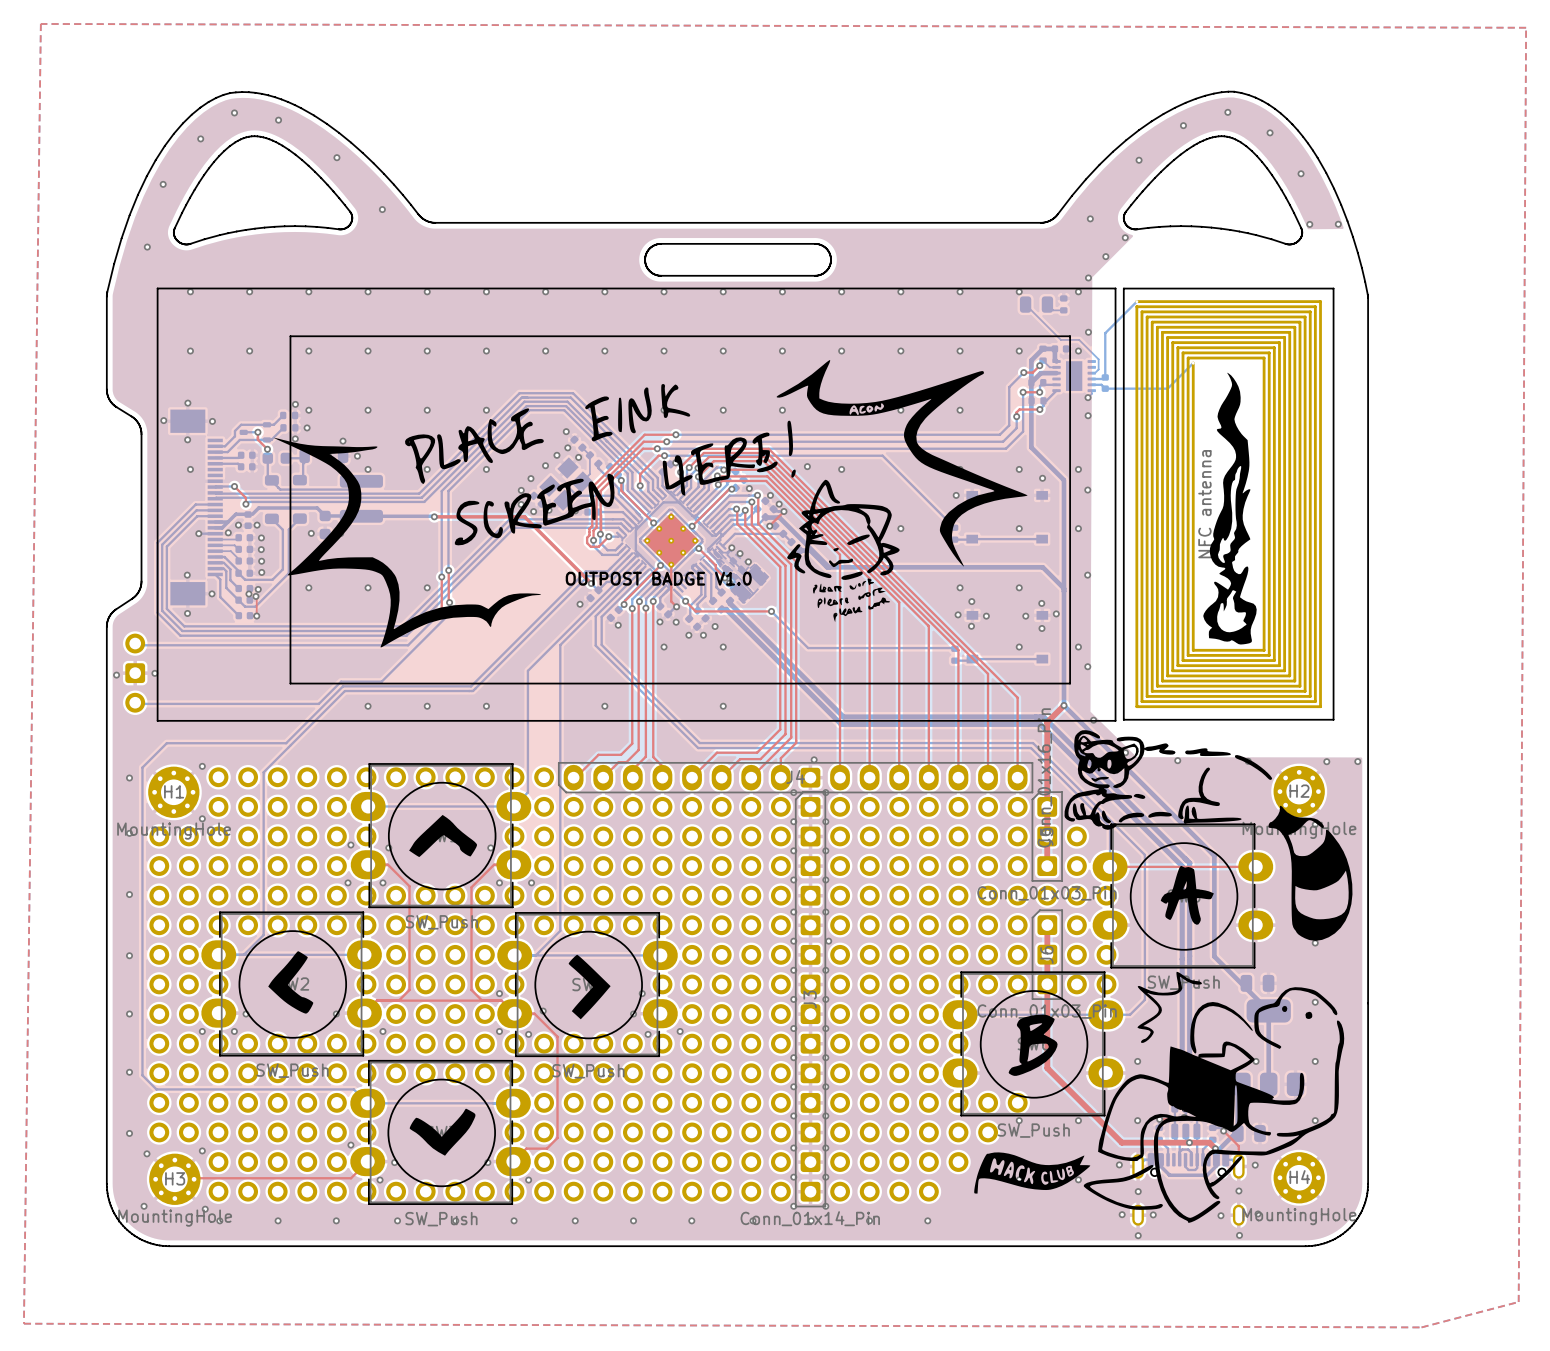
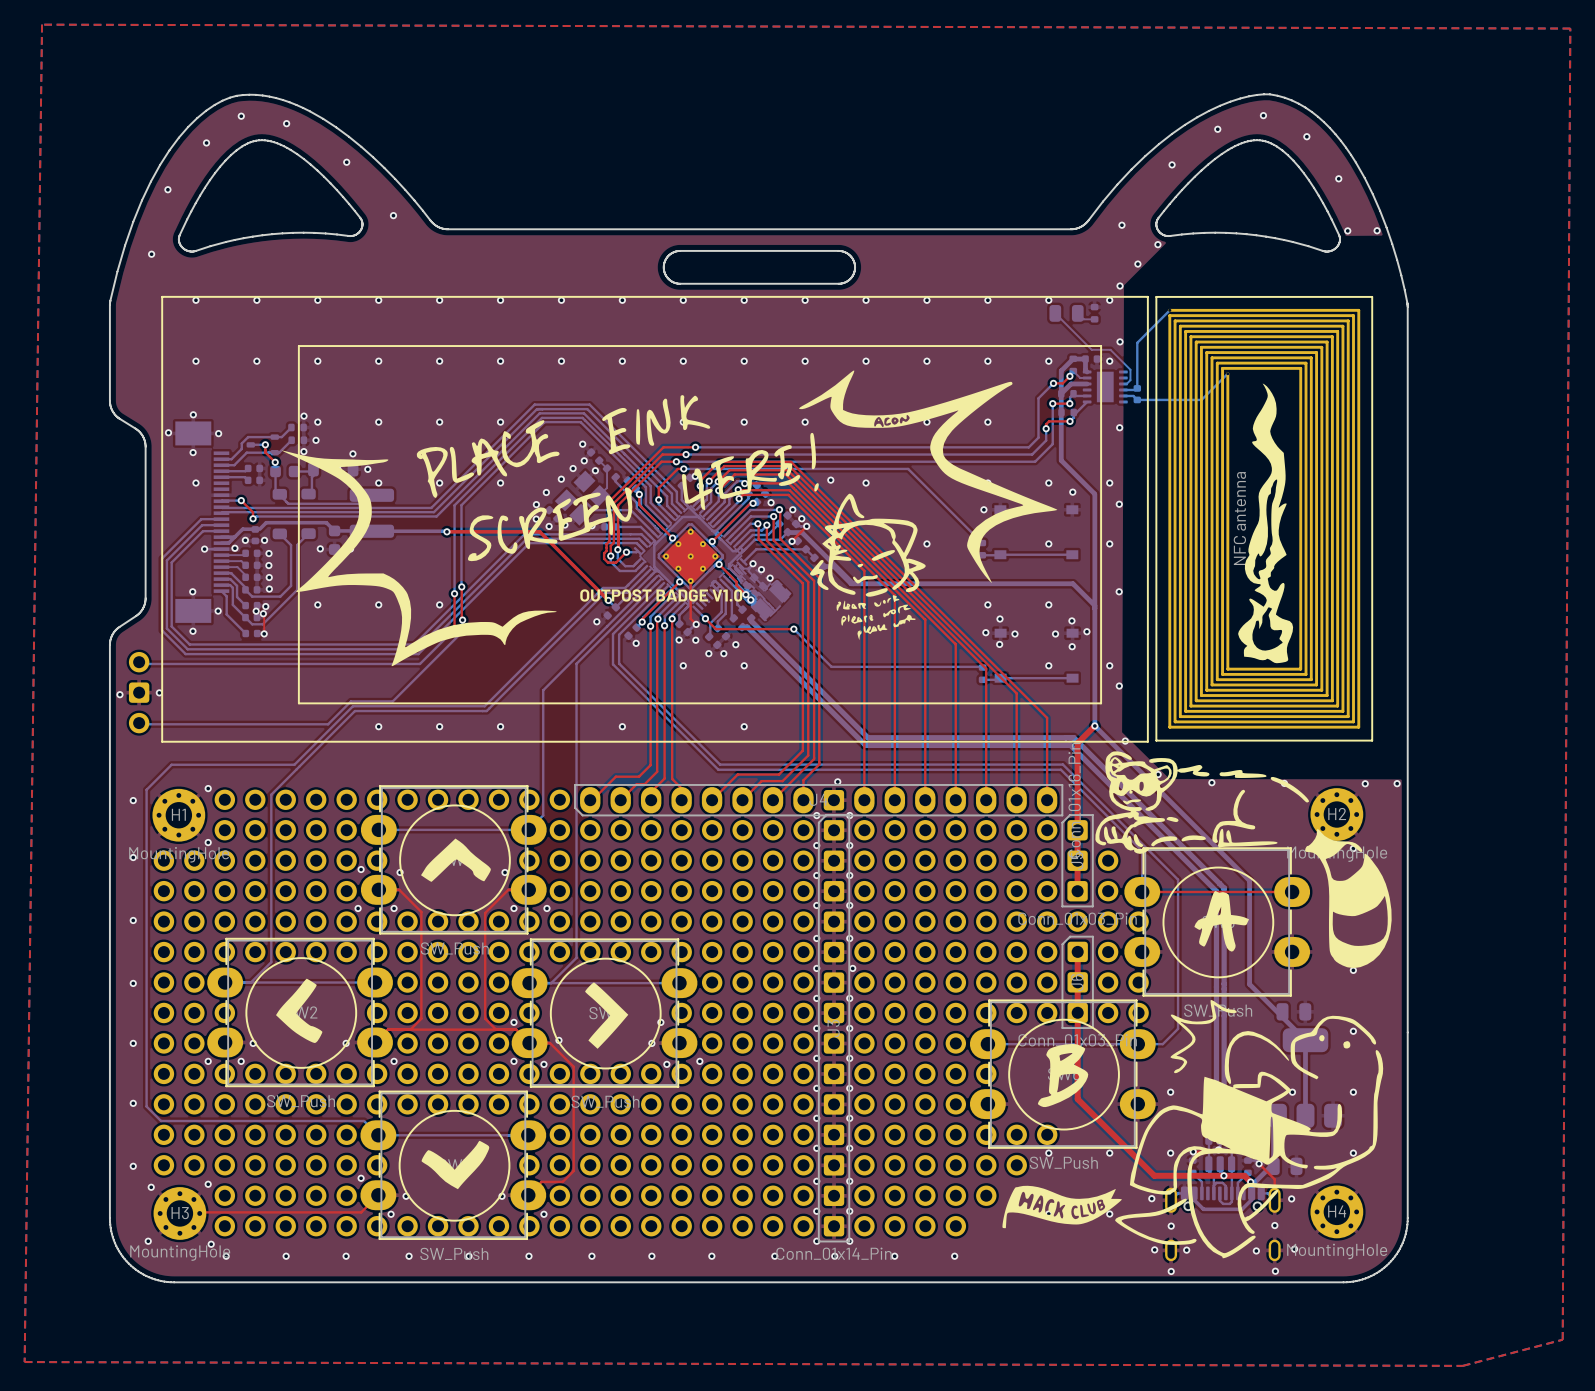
bottom track: (1091, 390) (1091, 393) (1088, 397) -> none
via: (1088, 397) -> none

